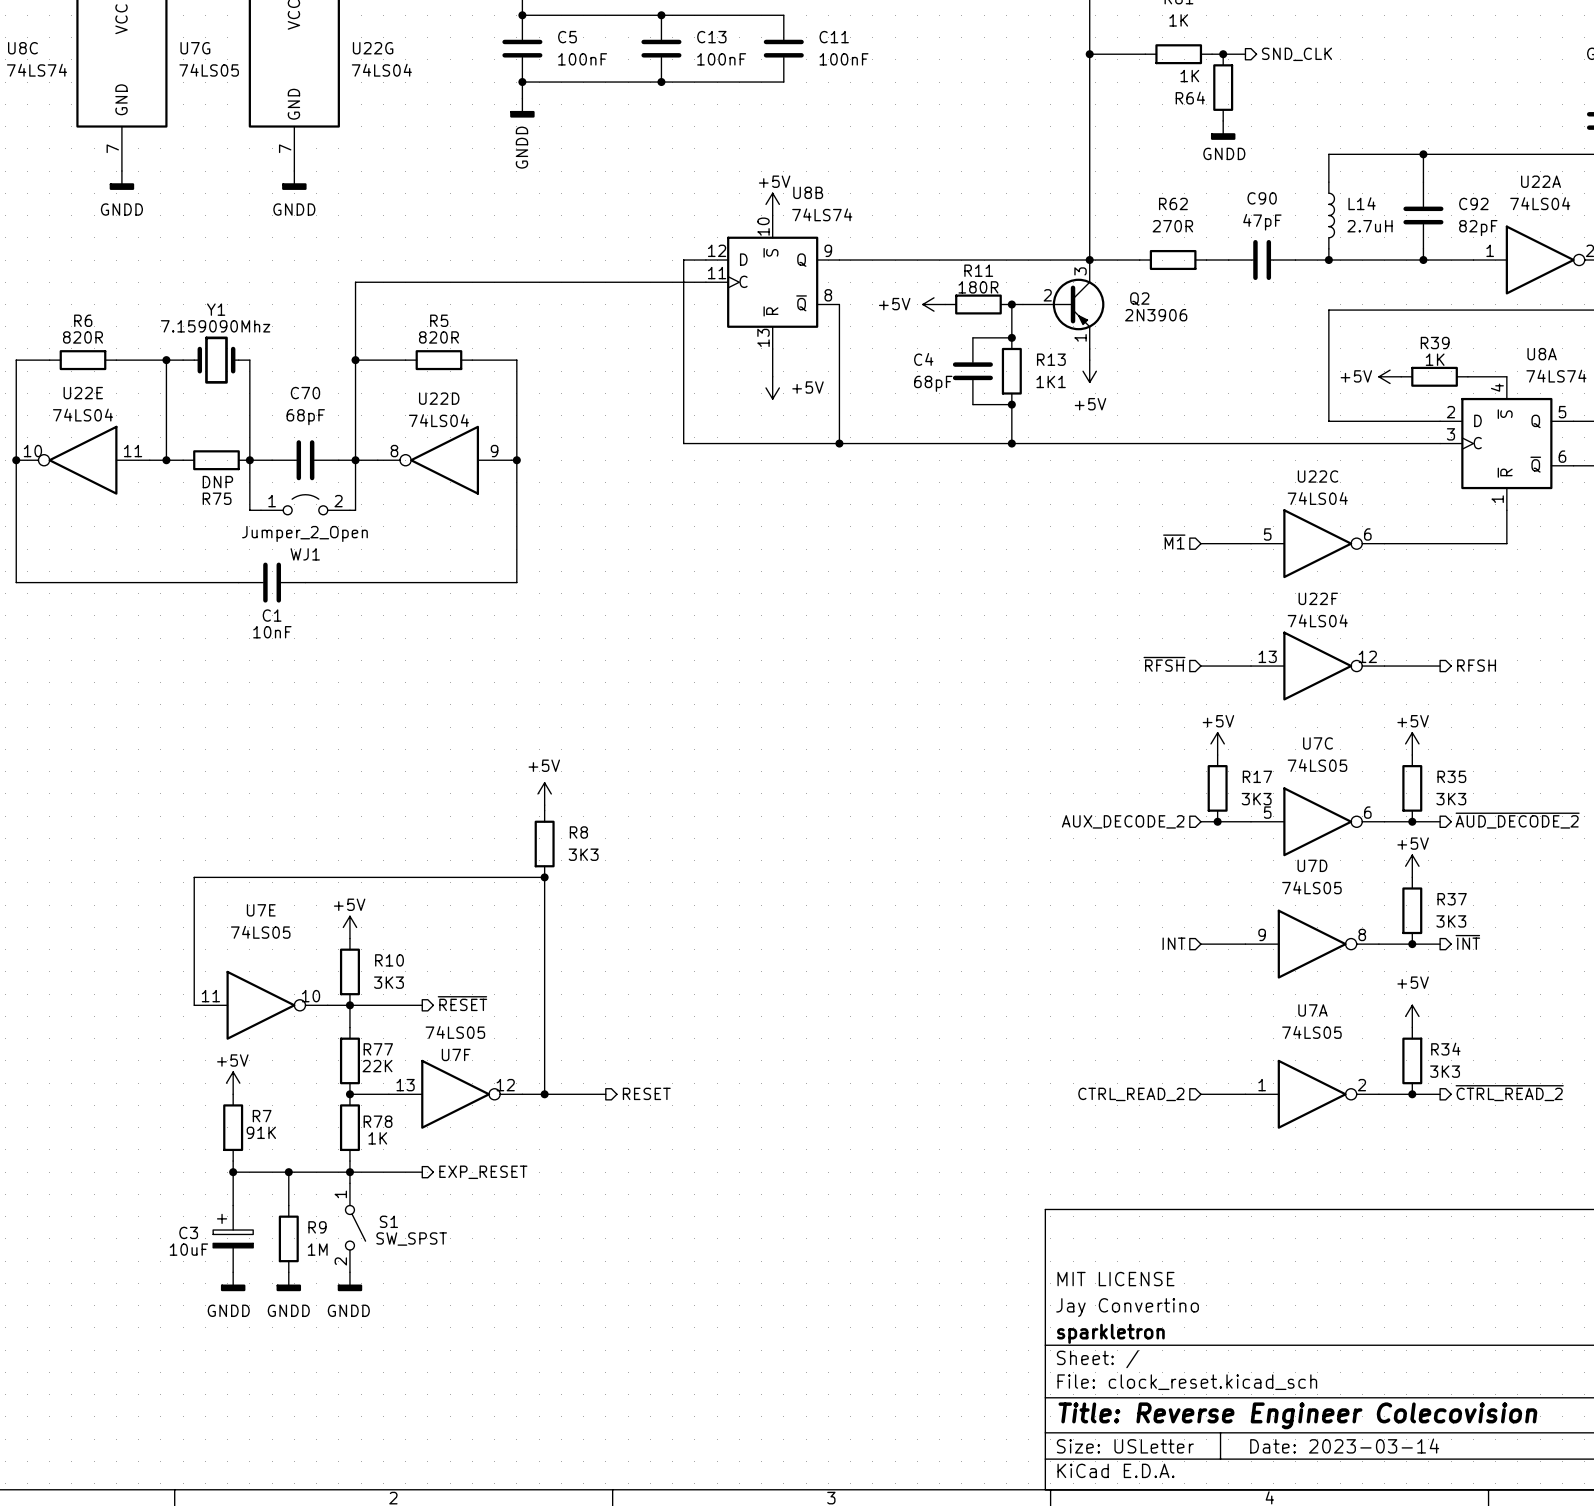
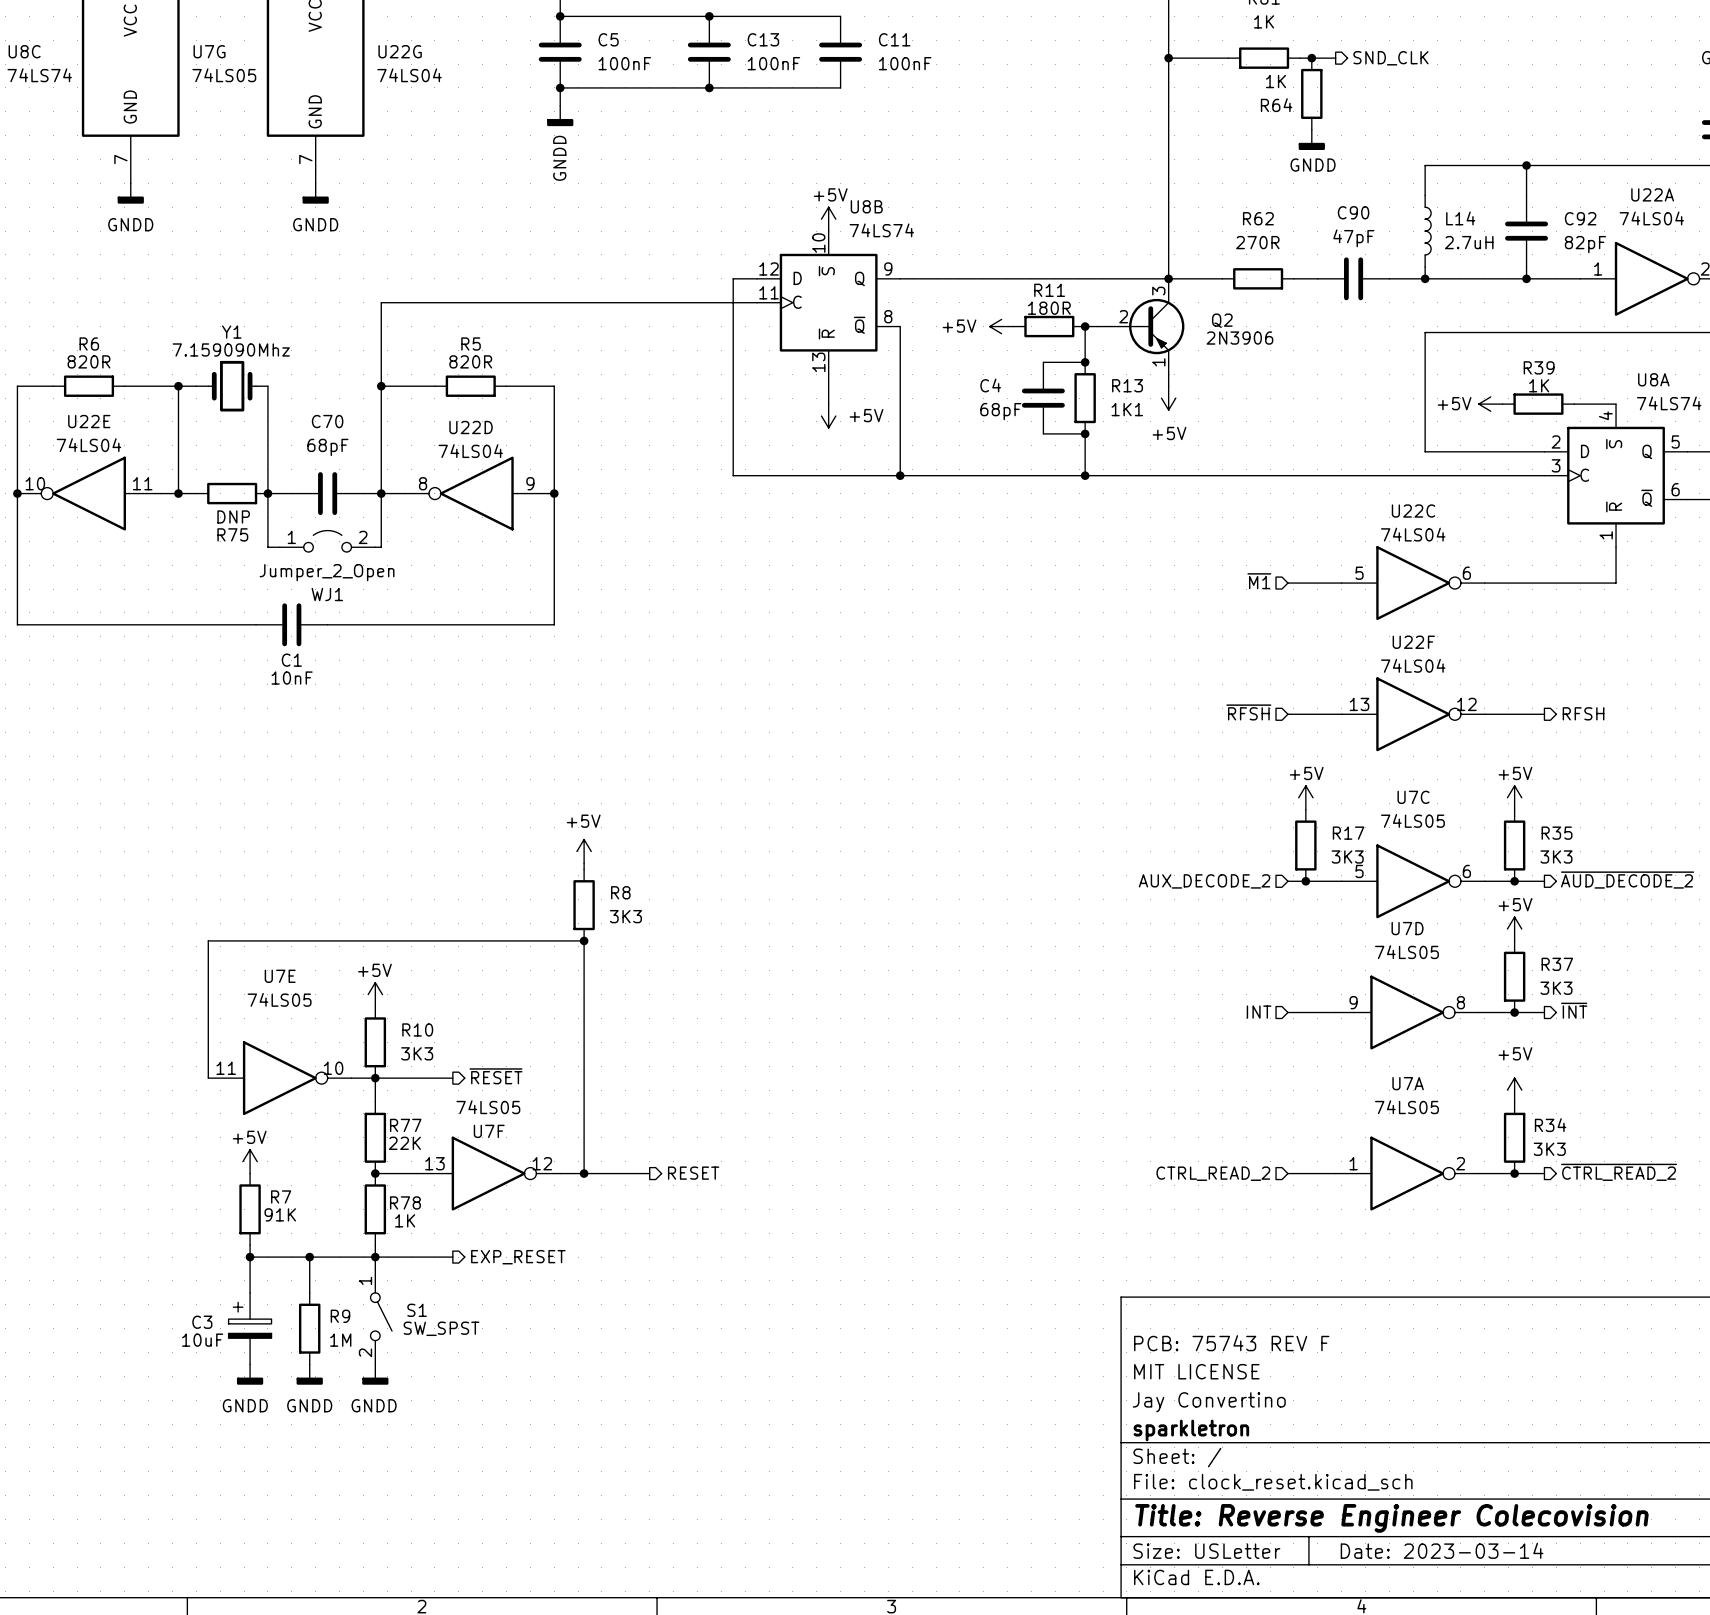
title block: none -> PCB: 75743 REV F (1231, 1343)

